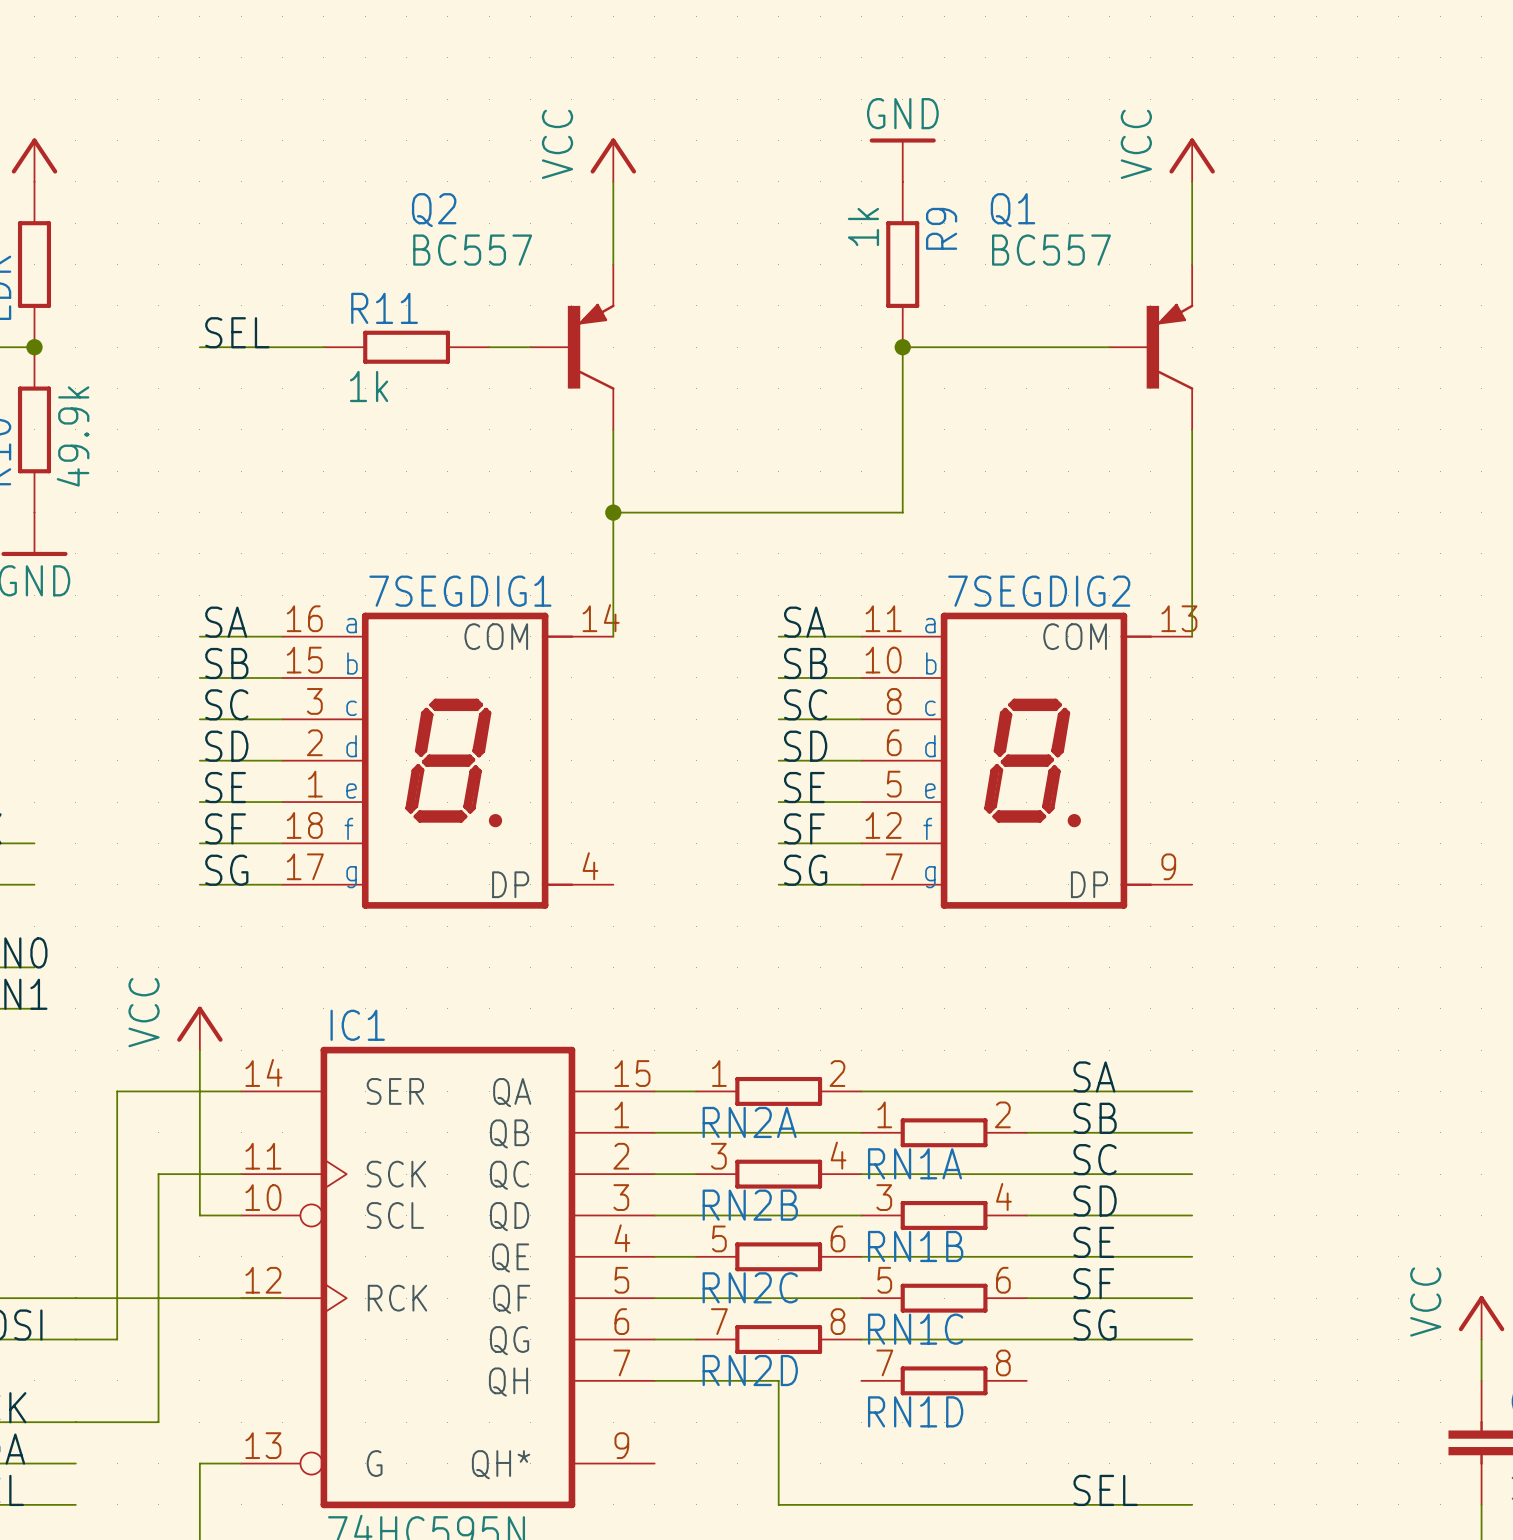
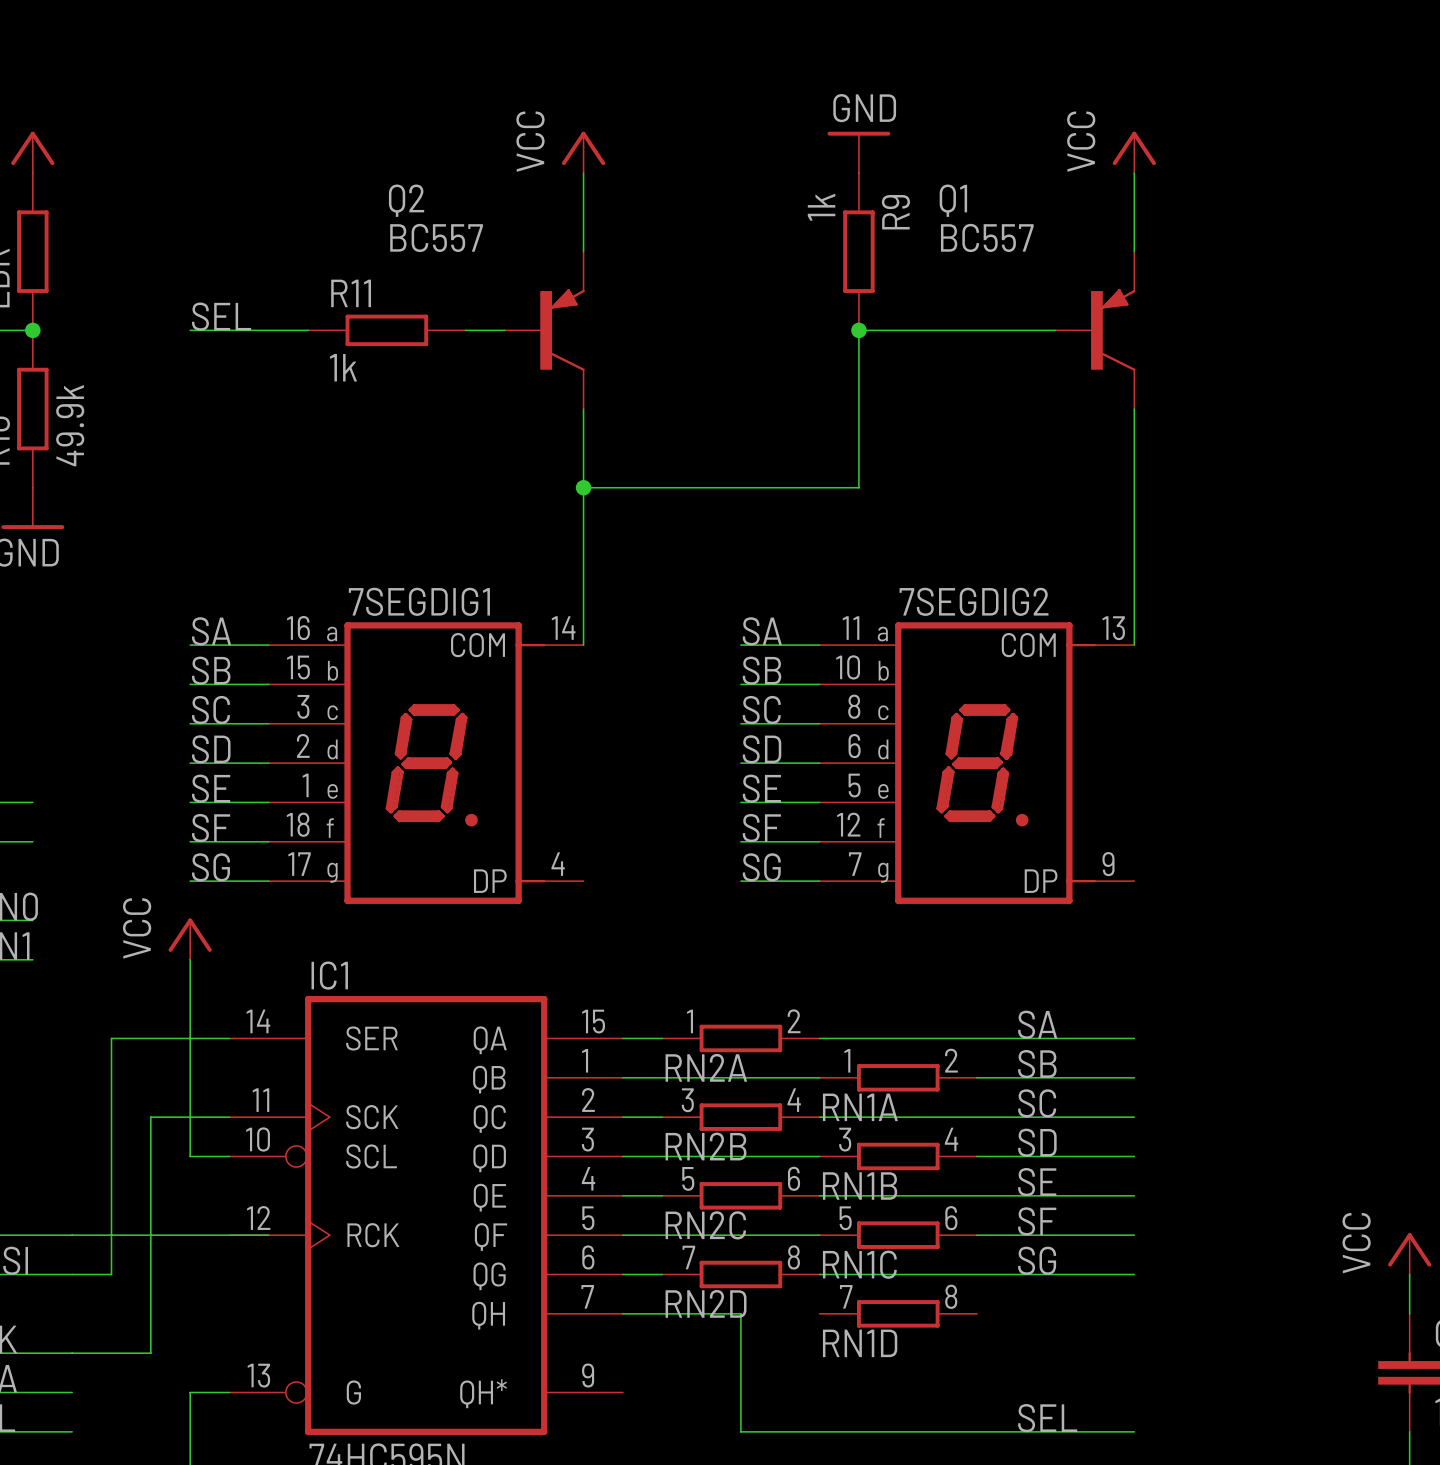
label: SA (226, 622) -> none
label: SA (805, 622) -> none
wire: (199, 636) (282, 636) -> (190, 881) (268, 881)
wire: none -> (583, 605) (583, 645)
wire: (778, 636) (861, 636) -> (740, 881) (819, 881)
wire: none -> (1134, 605) (1134, 645)
label: SB (226, 663) -> SA (211, 631)
label: SB (805, 663) -> SA (762, 631)
label: SC (226, 704) -> SB (211, 670)
label: SC (805, 704) -> SB (762, 670)
label: SD (226, 746) -> SC (211, 710)
label: SD (805, 746) -> SC (761, 710)
7SEGDIG1 position: (447, 760) -> (426, 763)
7SEGDIG2 position: (1026, 760) -> (976, 763)
label: SE (225, 787) -> SD (211, 749)
label: SE (804, 787) -> SD (762, 749)
label: SF (225, 828) -> SE (211, 788)
label: SF (804, 828) -> SE (761, 788)
label: SG (226, 870) -> SF (211, 828)
label: SG (805, 870) -> SF (761, 828)
label: none -> SG (211, 867)
label: none -> SG (761, 867)
power symbol position: VCC (199, 1028) -> VCC (190, 939)

